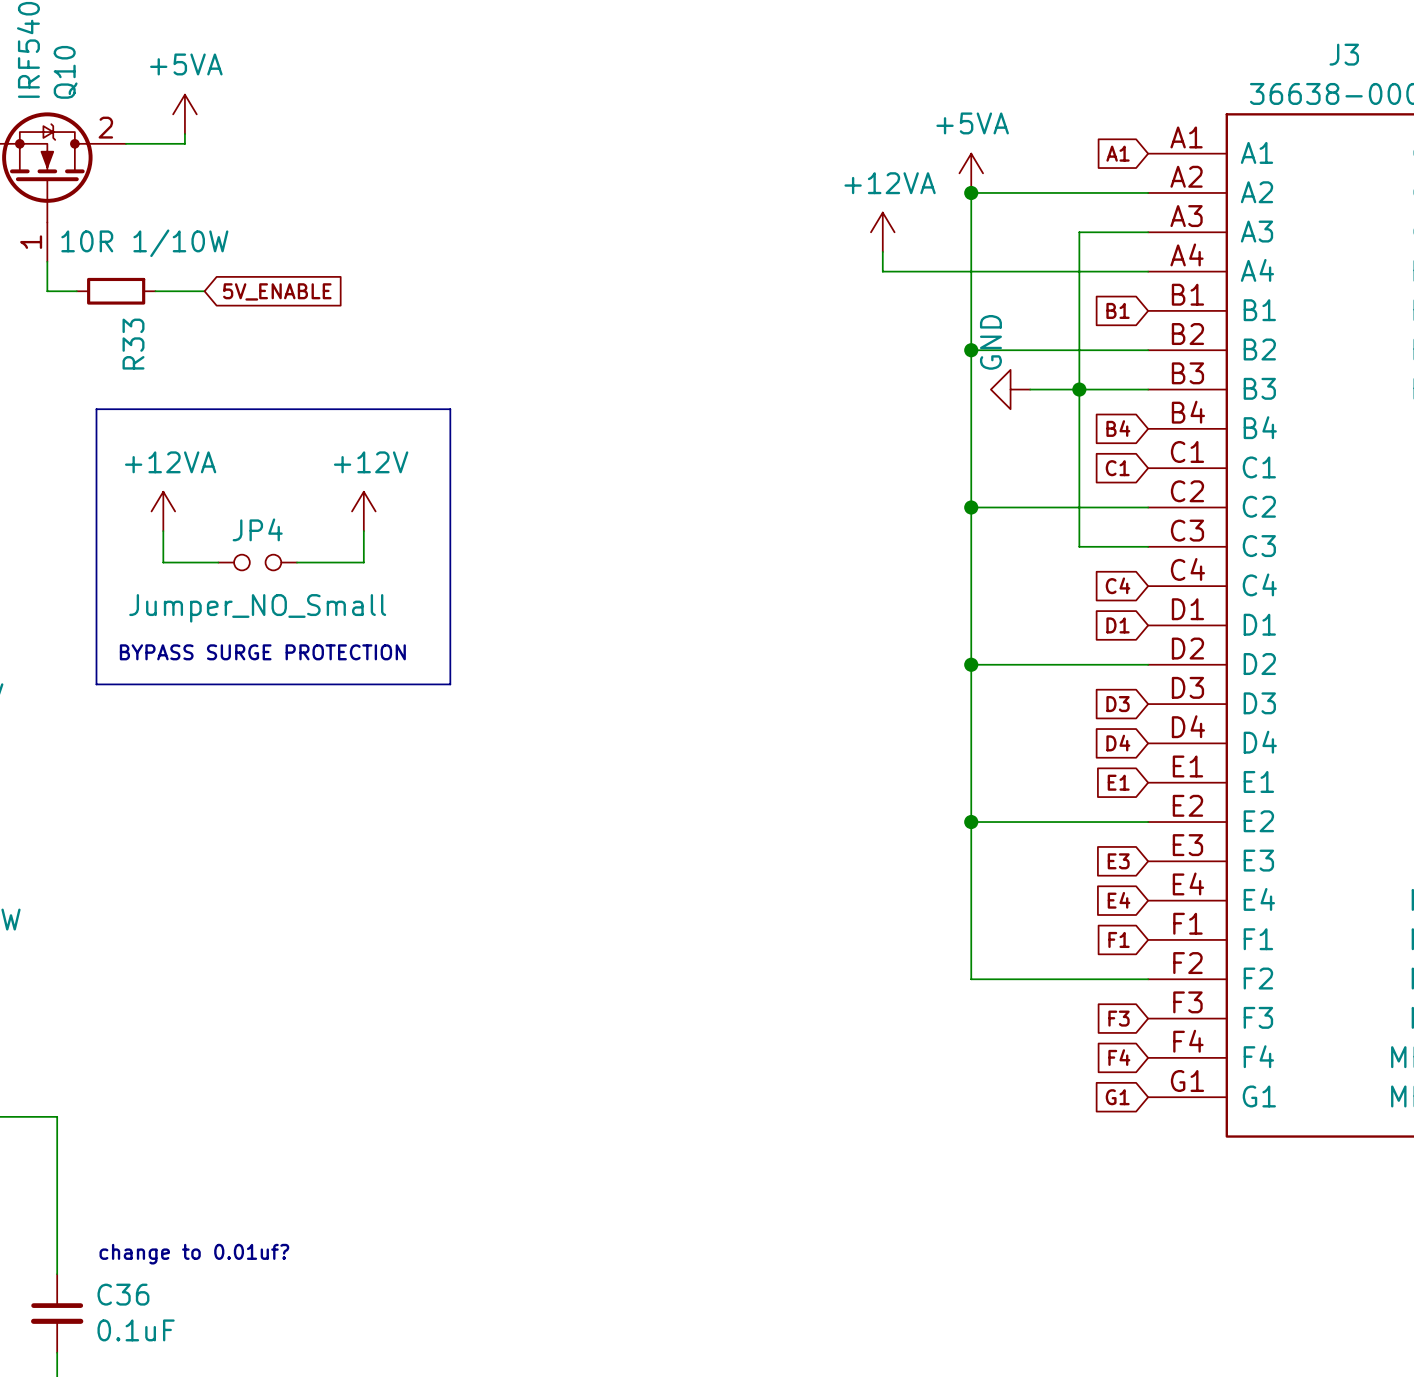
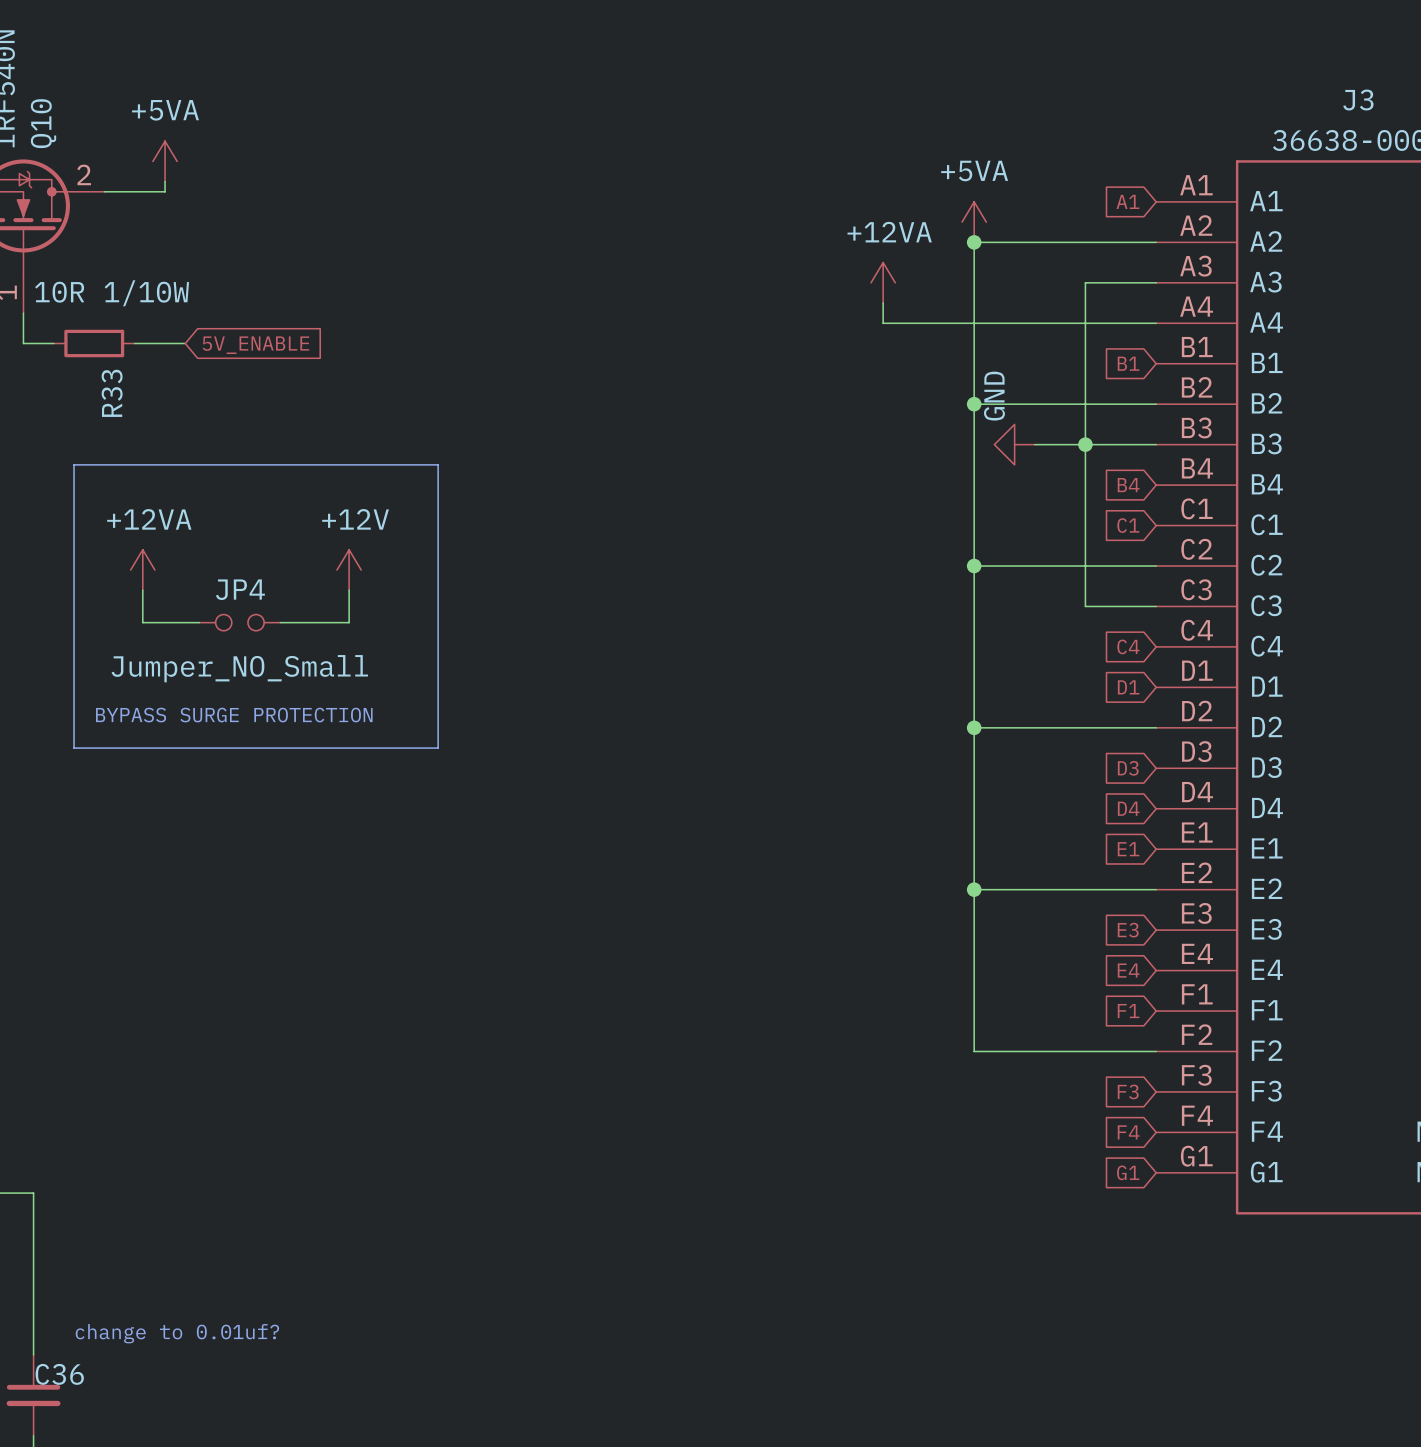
C36 name position: C36 (123, 1294) -> C36 (59, 1374)
C36 value: 0.1uF (136, 1330) -> none

